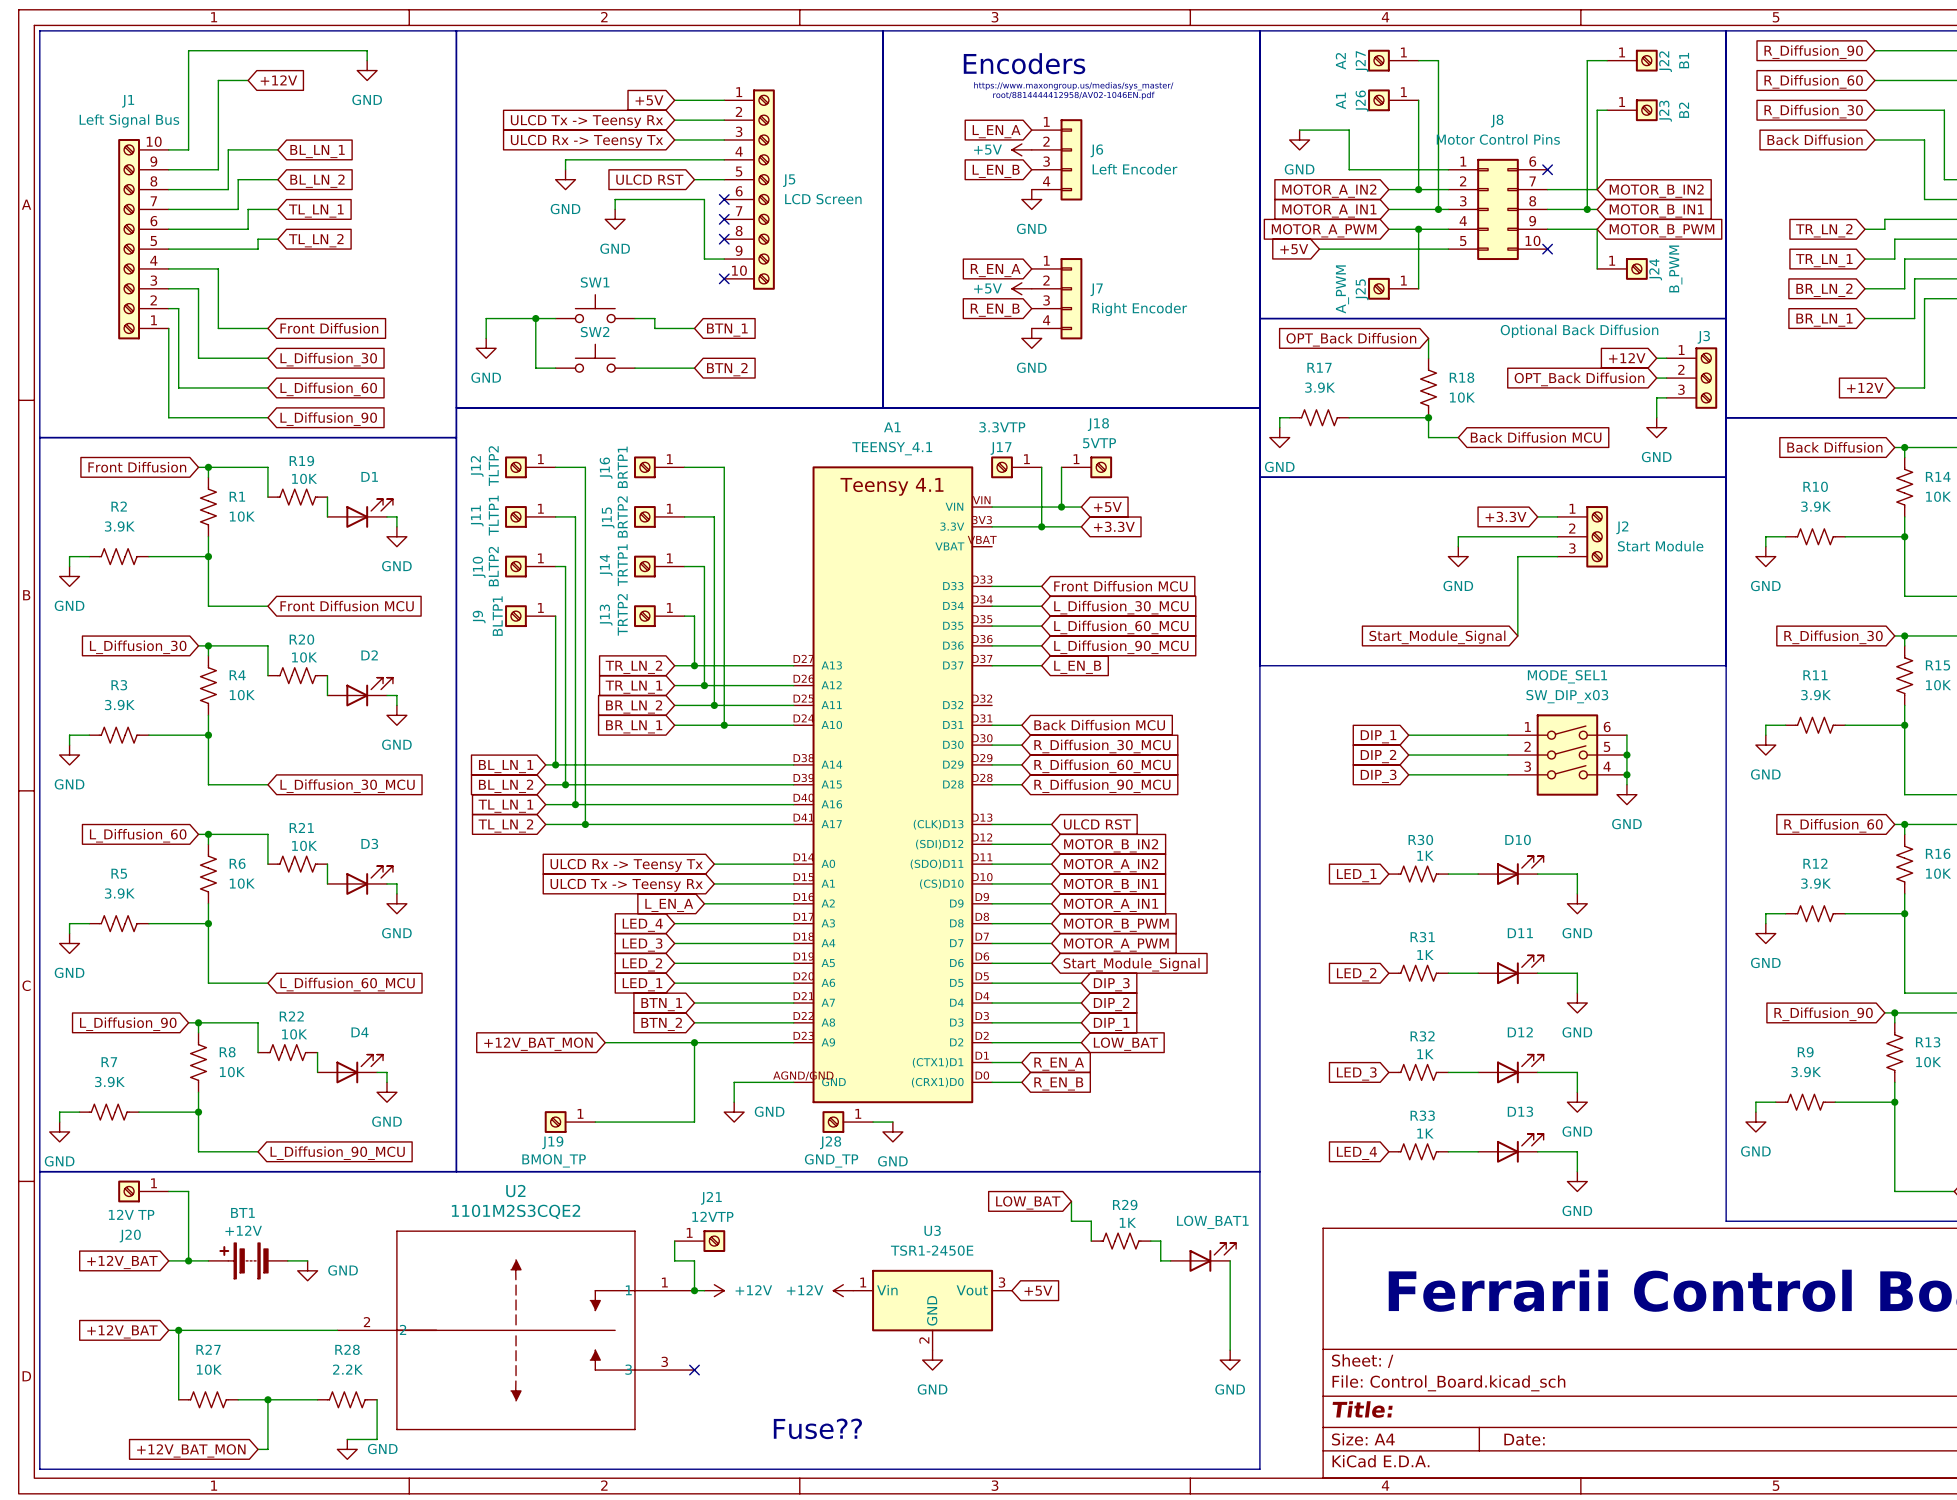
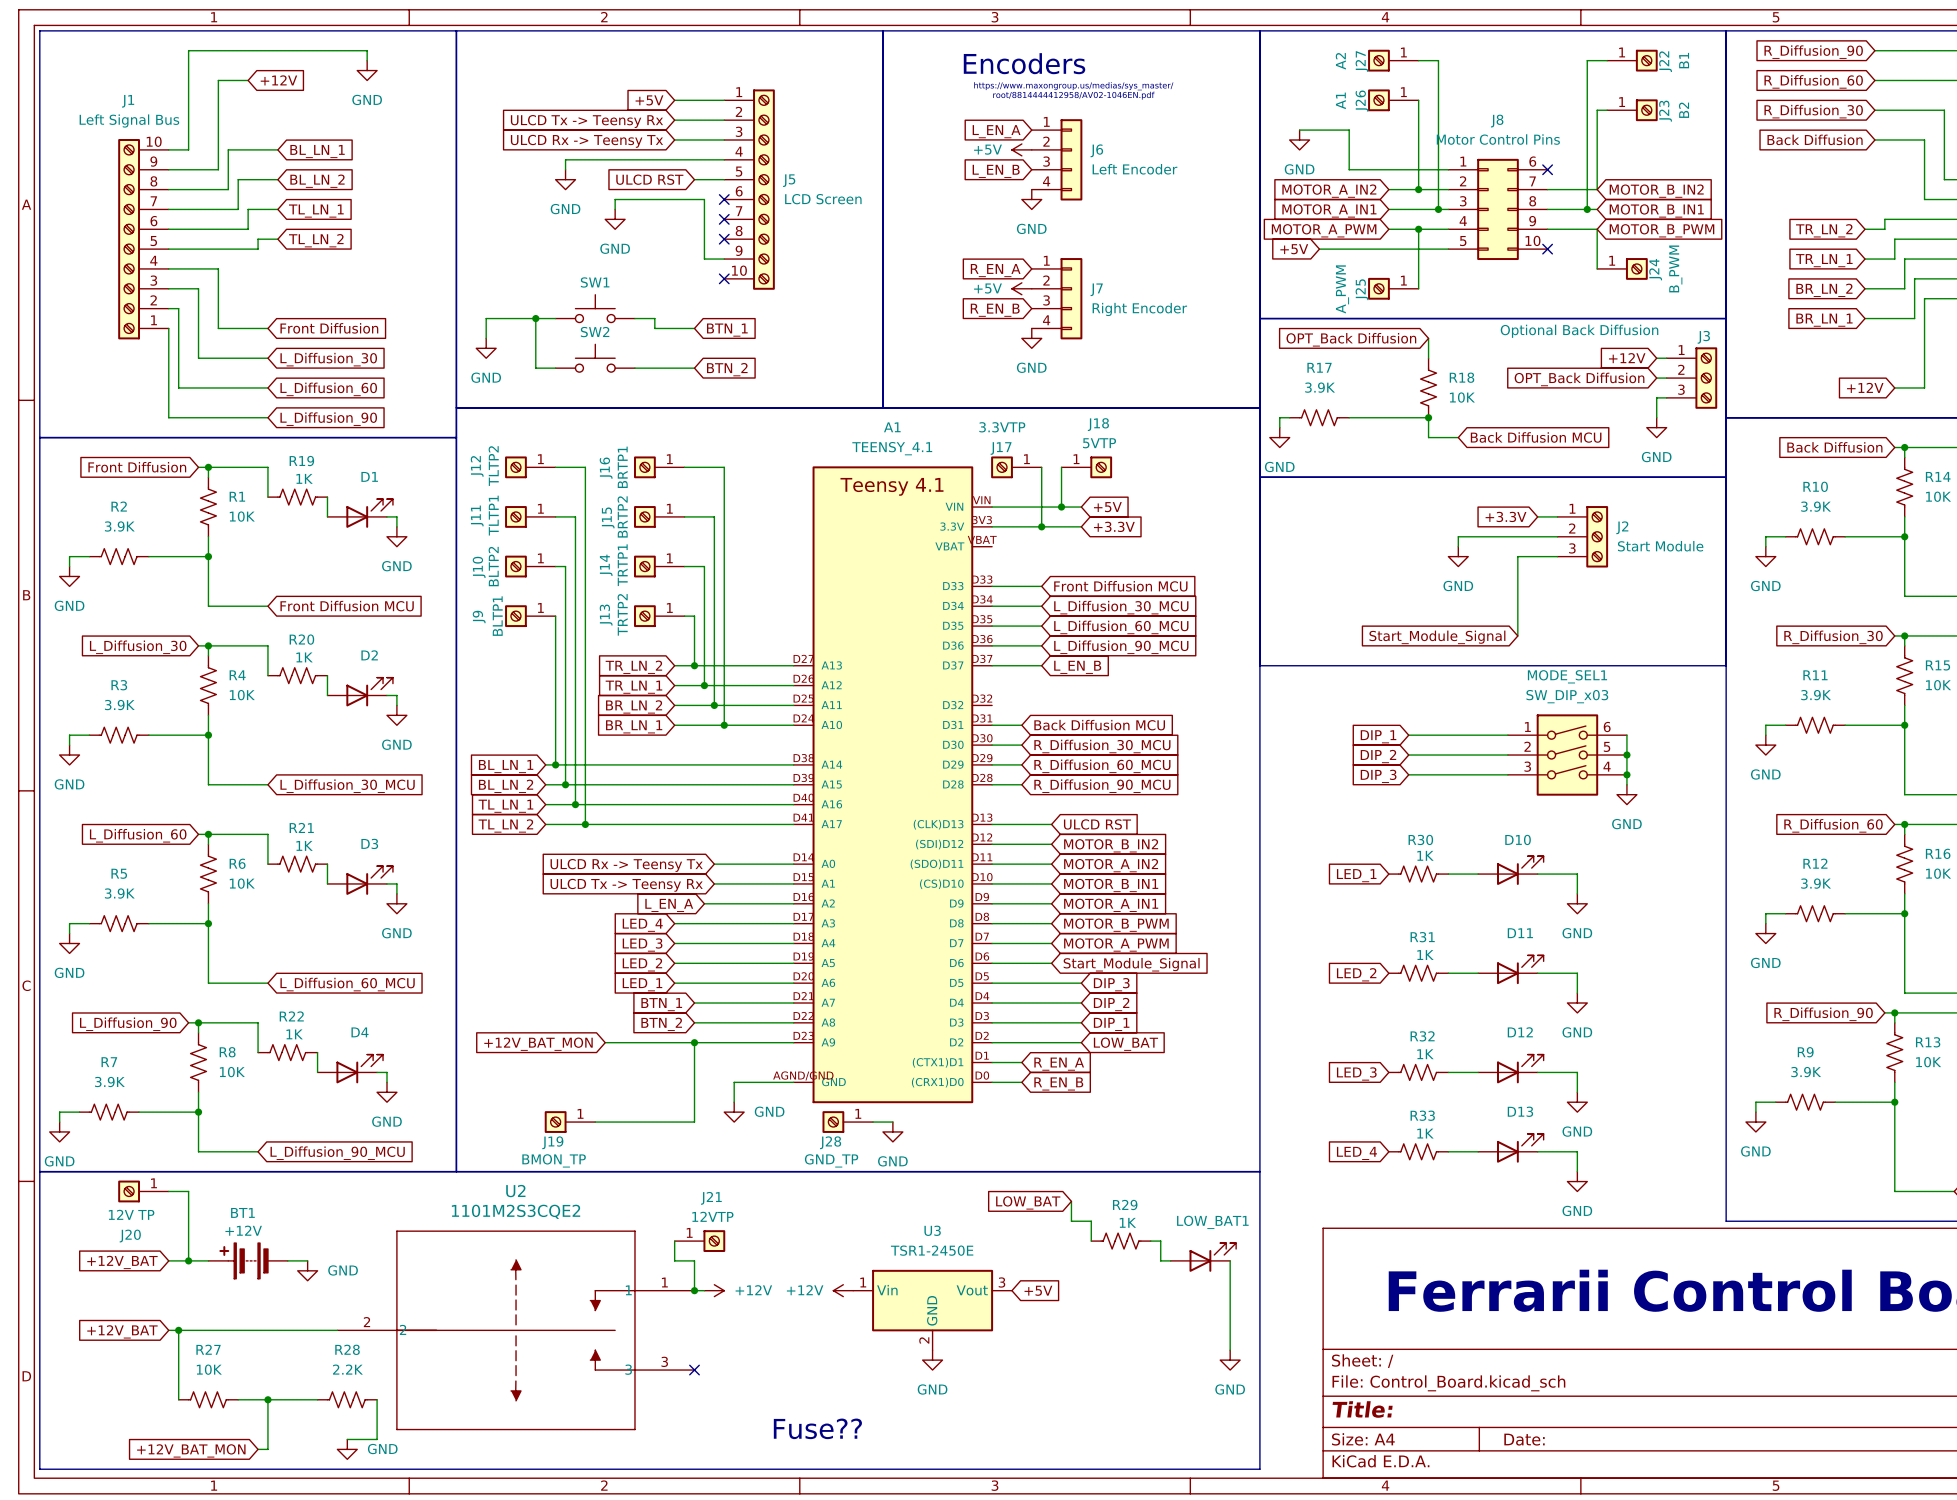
R19 value: 10K (304, 478) -> 1K (304, 478)
R20 value: 10K (304, 657) -> 1K (304, 657)
R21 value: 10K (304, 845) -> 1K (304, 845)
R22 value: 10K (294, 1034) -> 1K (294, 1034)

